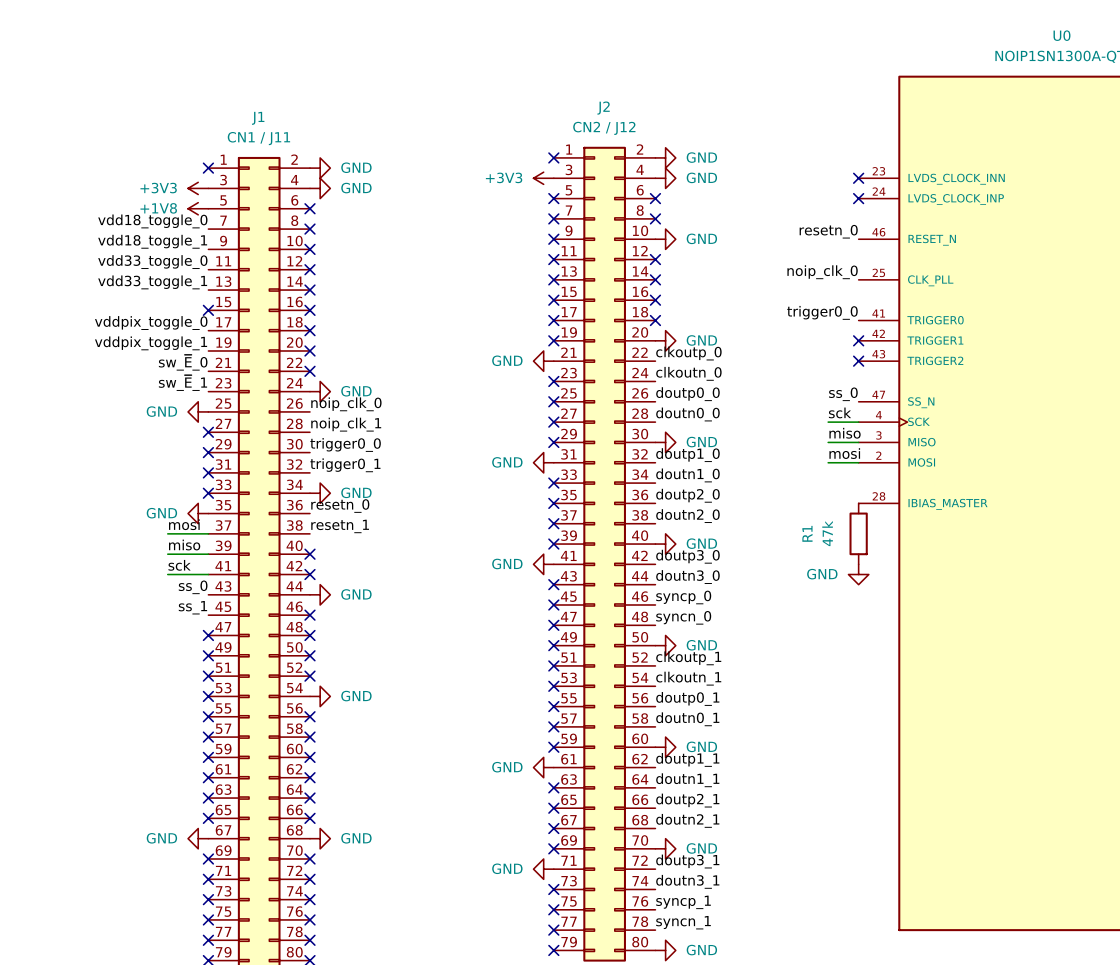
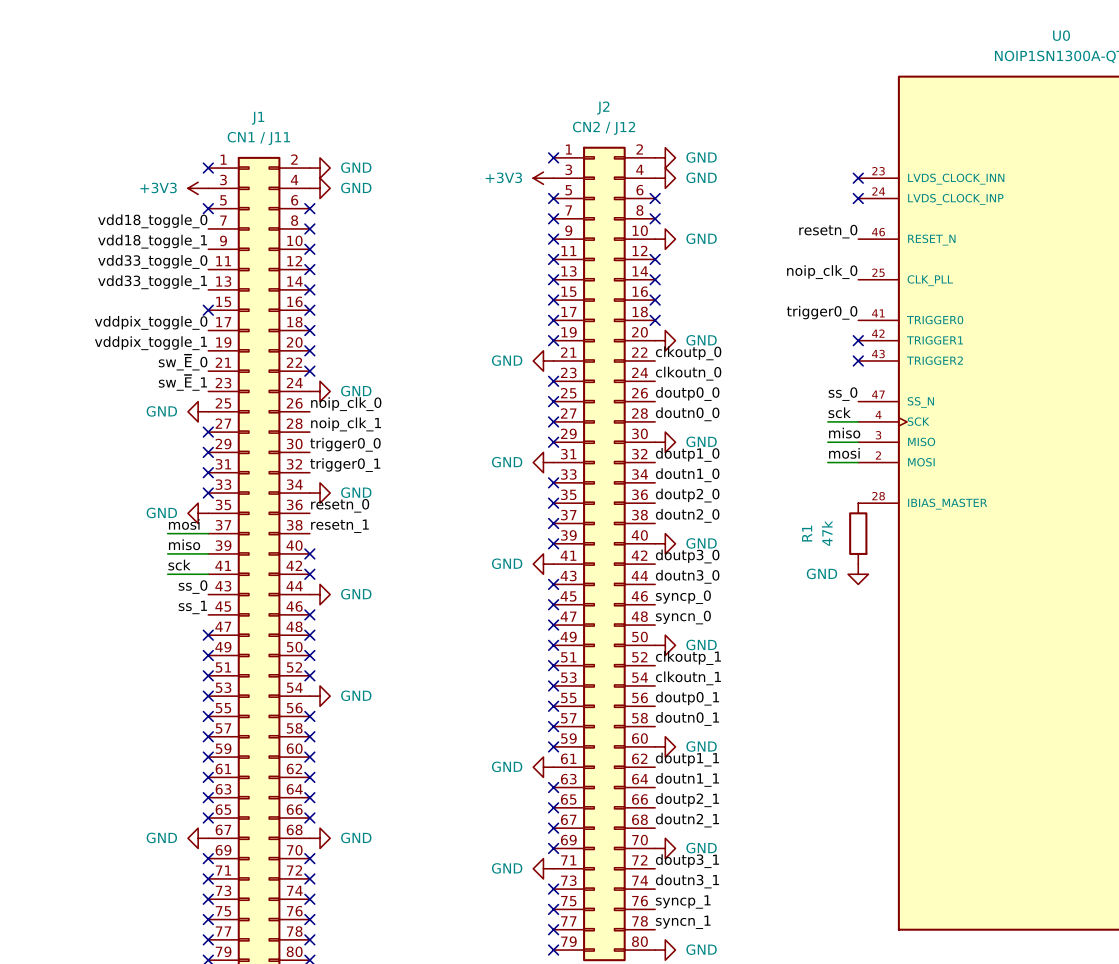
power symbol: +1V8 (198, 208) -> none
no-connect mark: none -> (208, 208)

